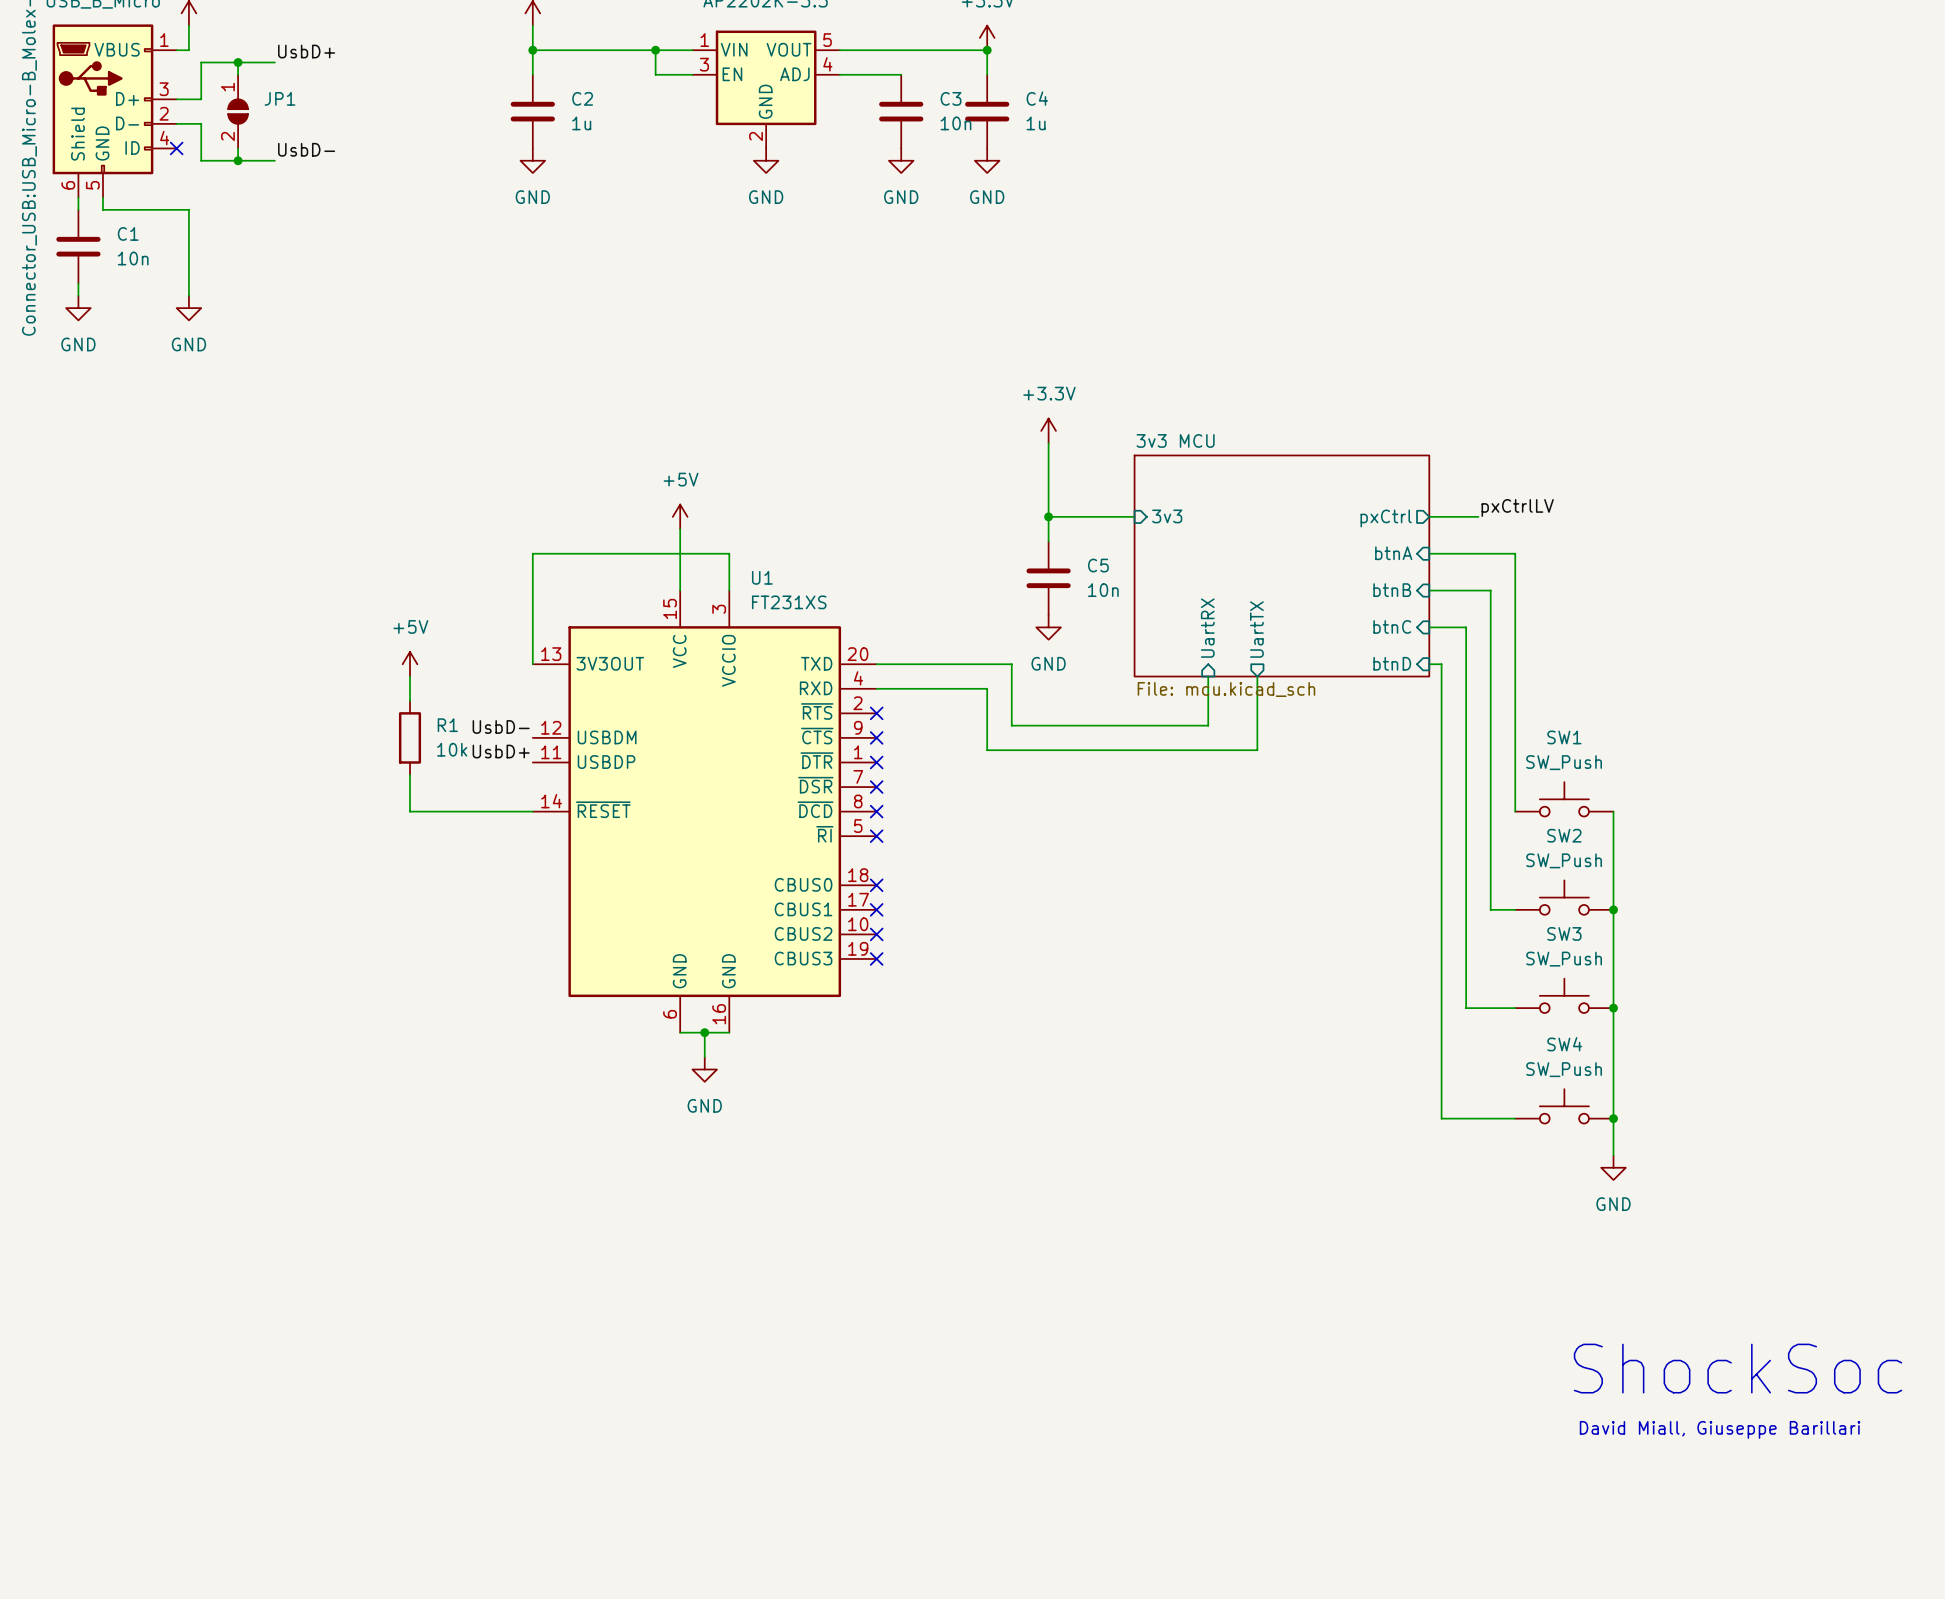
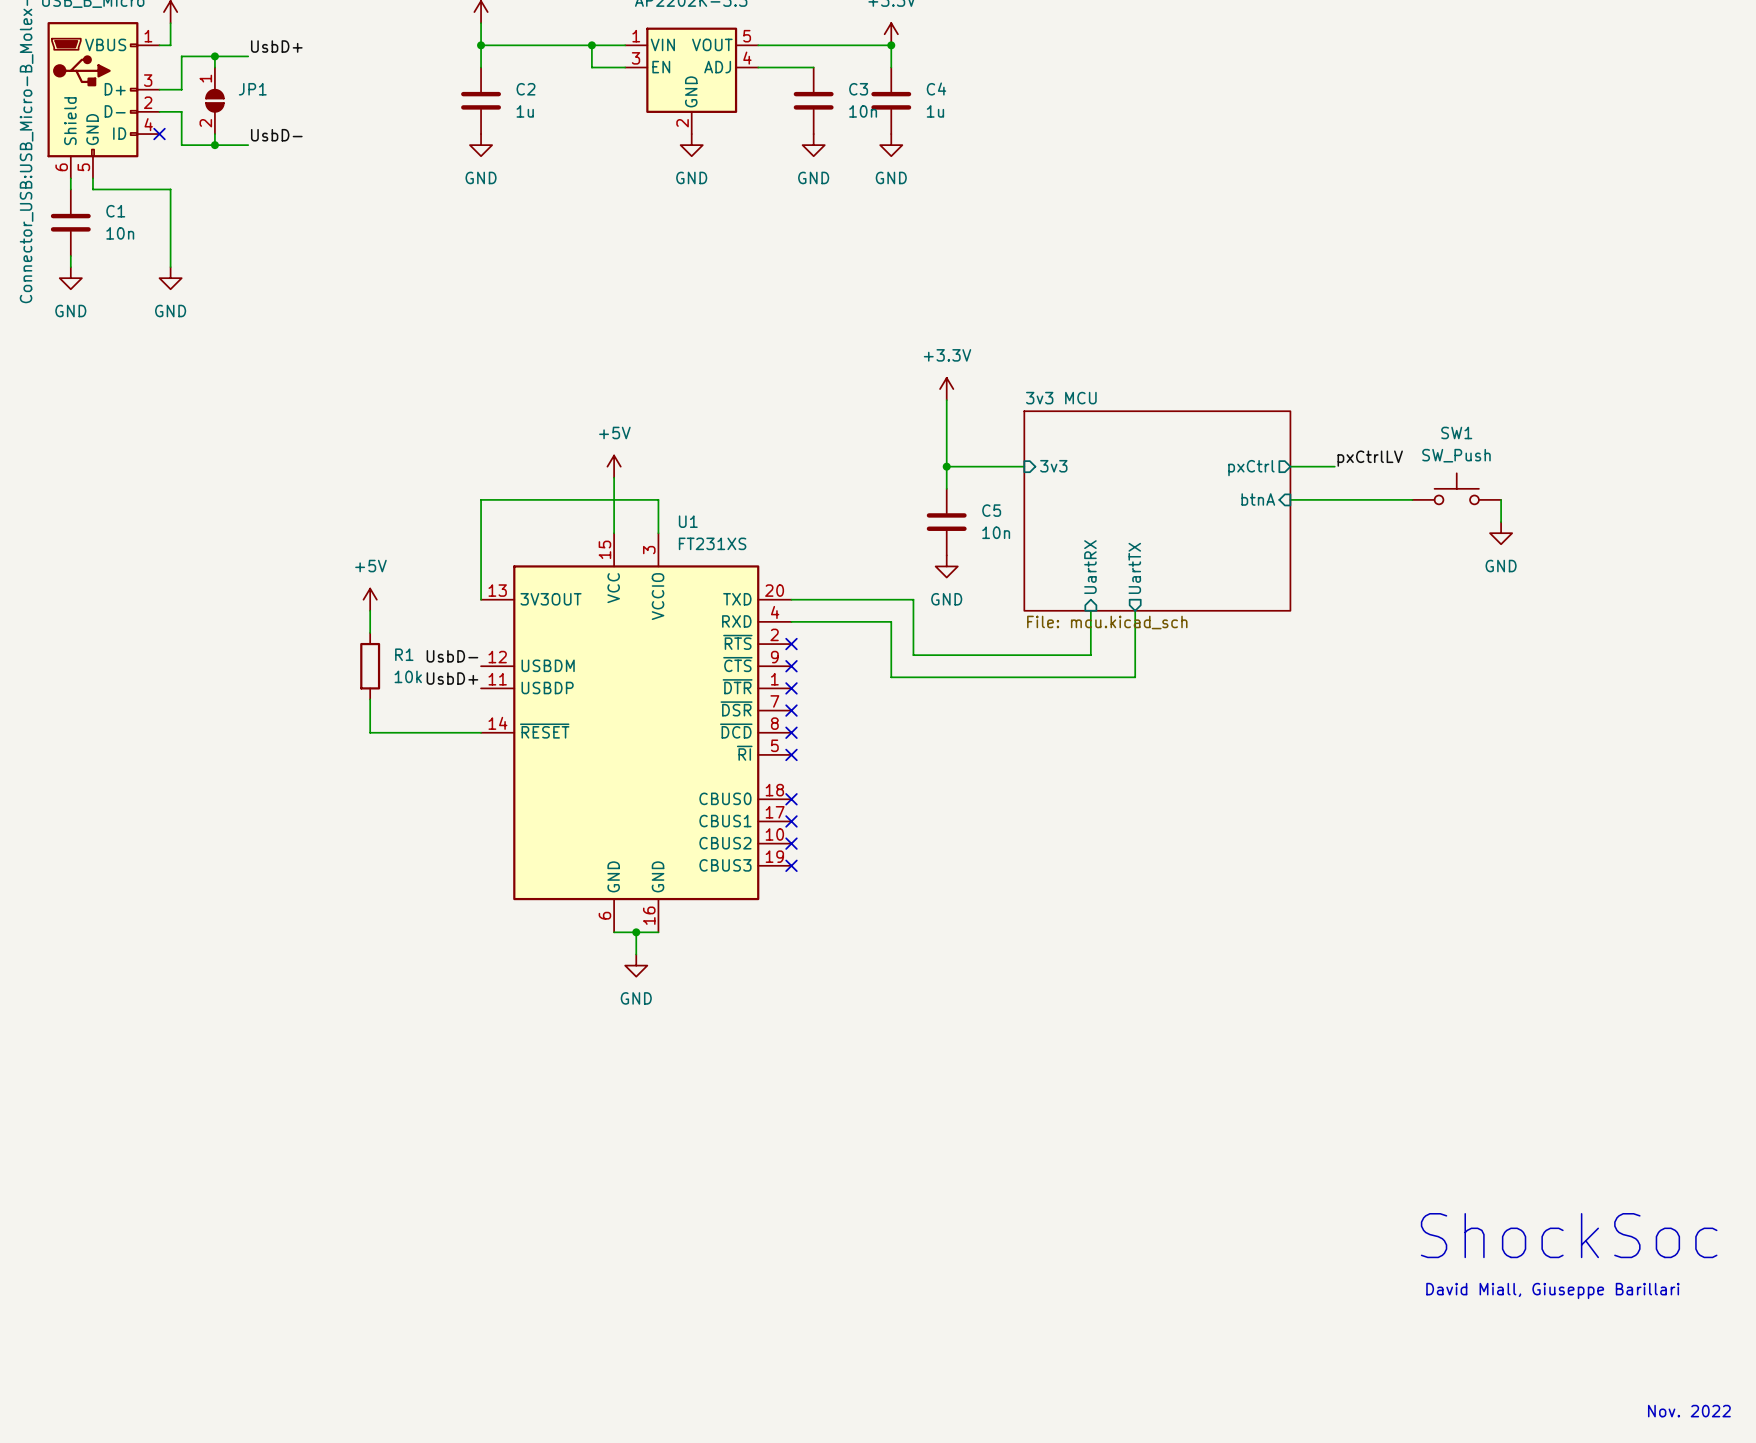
wire: (1515, 553) (1515, 811) -> (1368, 499) (1412, 499)
wire: none -> (1501, 499) (1501, 522)
sheet pin: btnB (1392, 590) -> none
wire: (1429, 590) (1490, 590) (1490, 909) (1515, 909) -> none
power symbol: none -> GND (1501, 533)
sheet pin: btnC (1392, 626) -> none
wire: (1429, 627) (1466, 627) (1466, 1008) (1515, 1008) -> none
sheet pin: btnD (1392, 663) -> none
wire: (1429, 664) (1441, 664) (1441, 1118) (1515, 1118) -> none
SW1 position: (1564, 799) -> (1456, 488)
wire: (1613, 811) (1613, 1155) -> none
SW2: SW_Push (1564, 897) -> none
junction: (1613, 909) -> none
SW3: SW_Push (1564, 995) -> none
junction: (1613, 1008) -> none
SW4: SW_Push (1564, 1106) -> none
junction: (1613, 1118) -> none
power symbol: GND (1613, 1167) -> none
text: none -> Nov. 2022 (1689, 1411)

